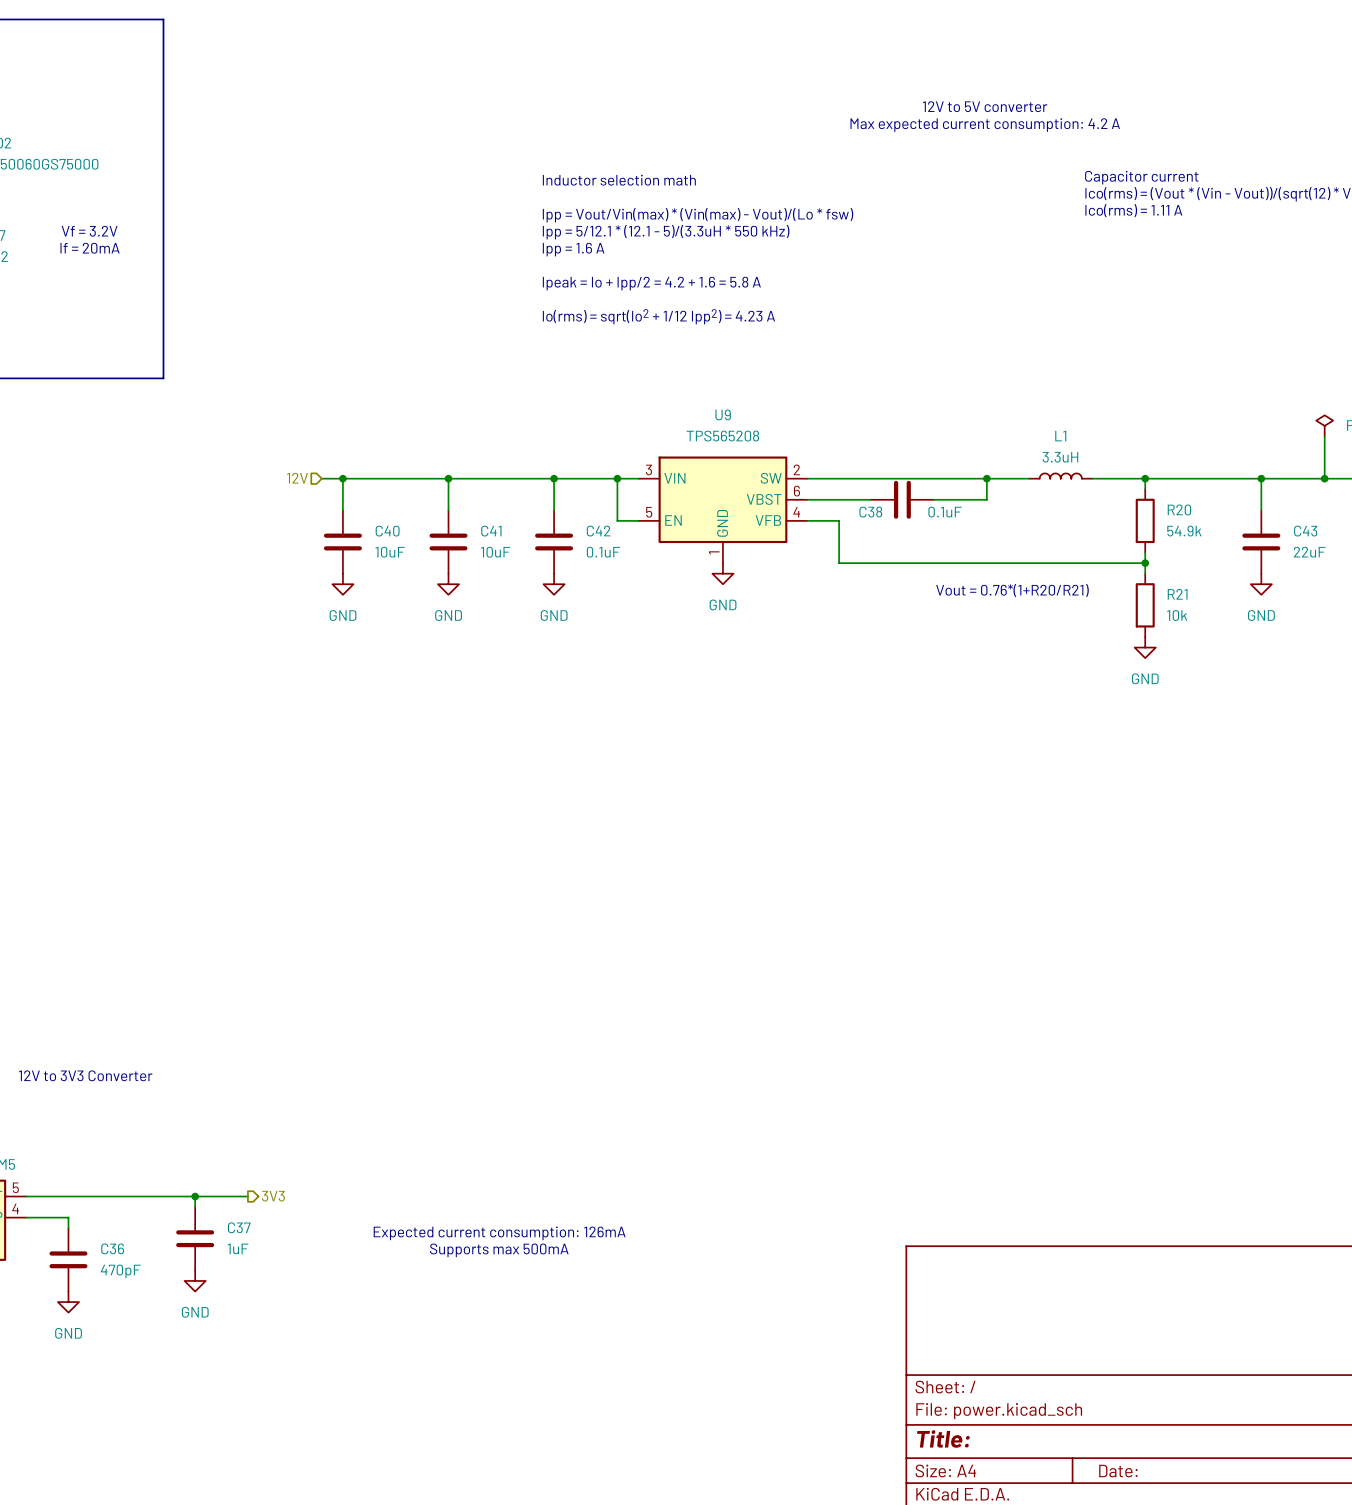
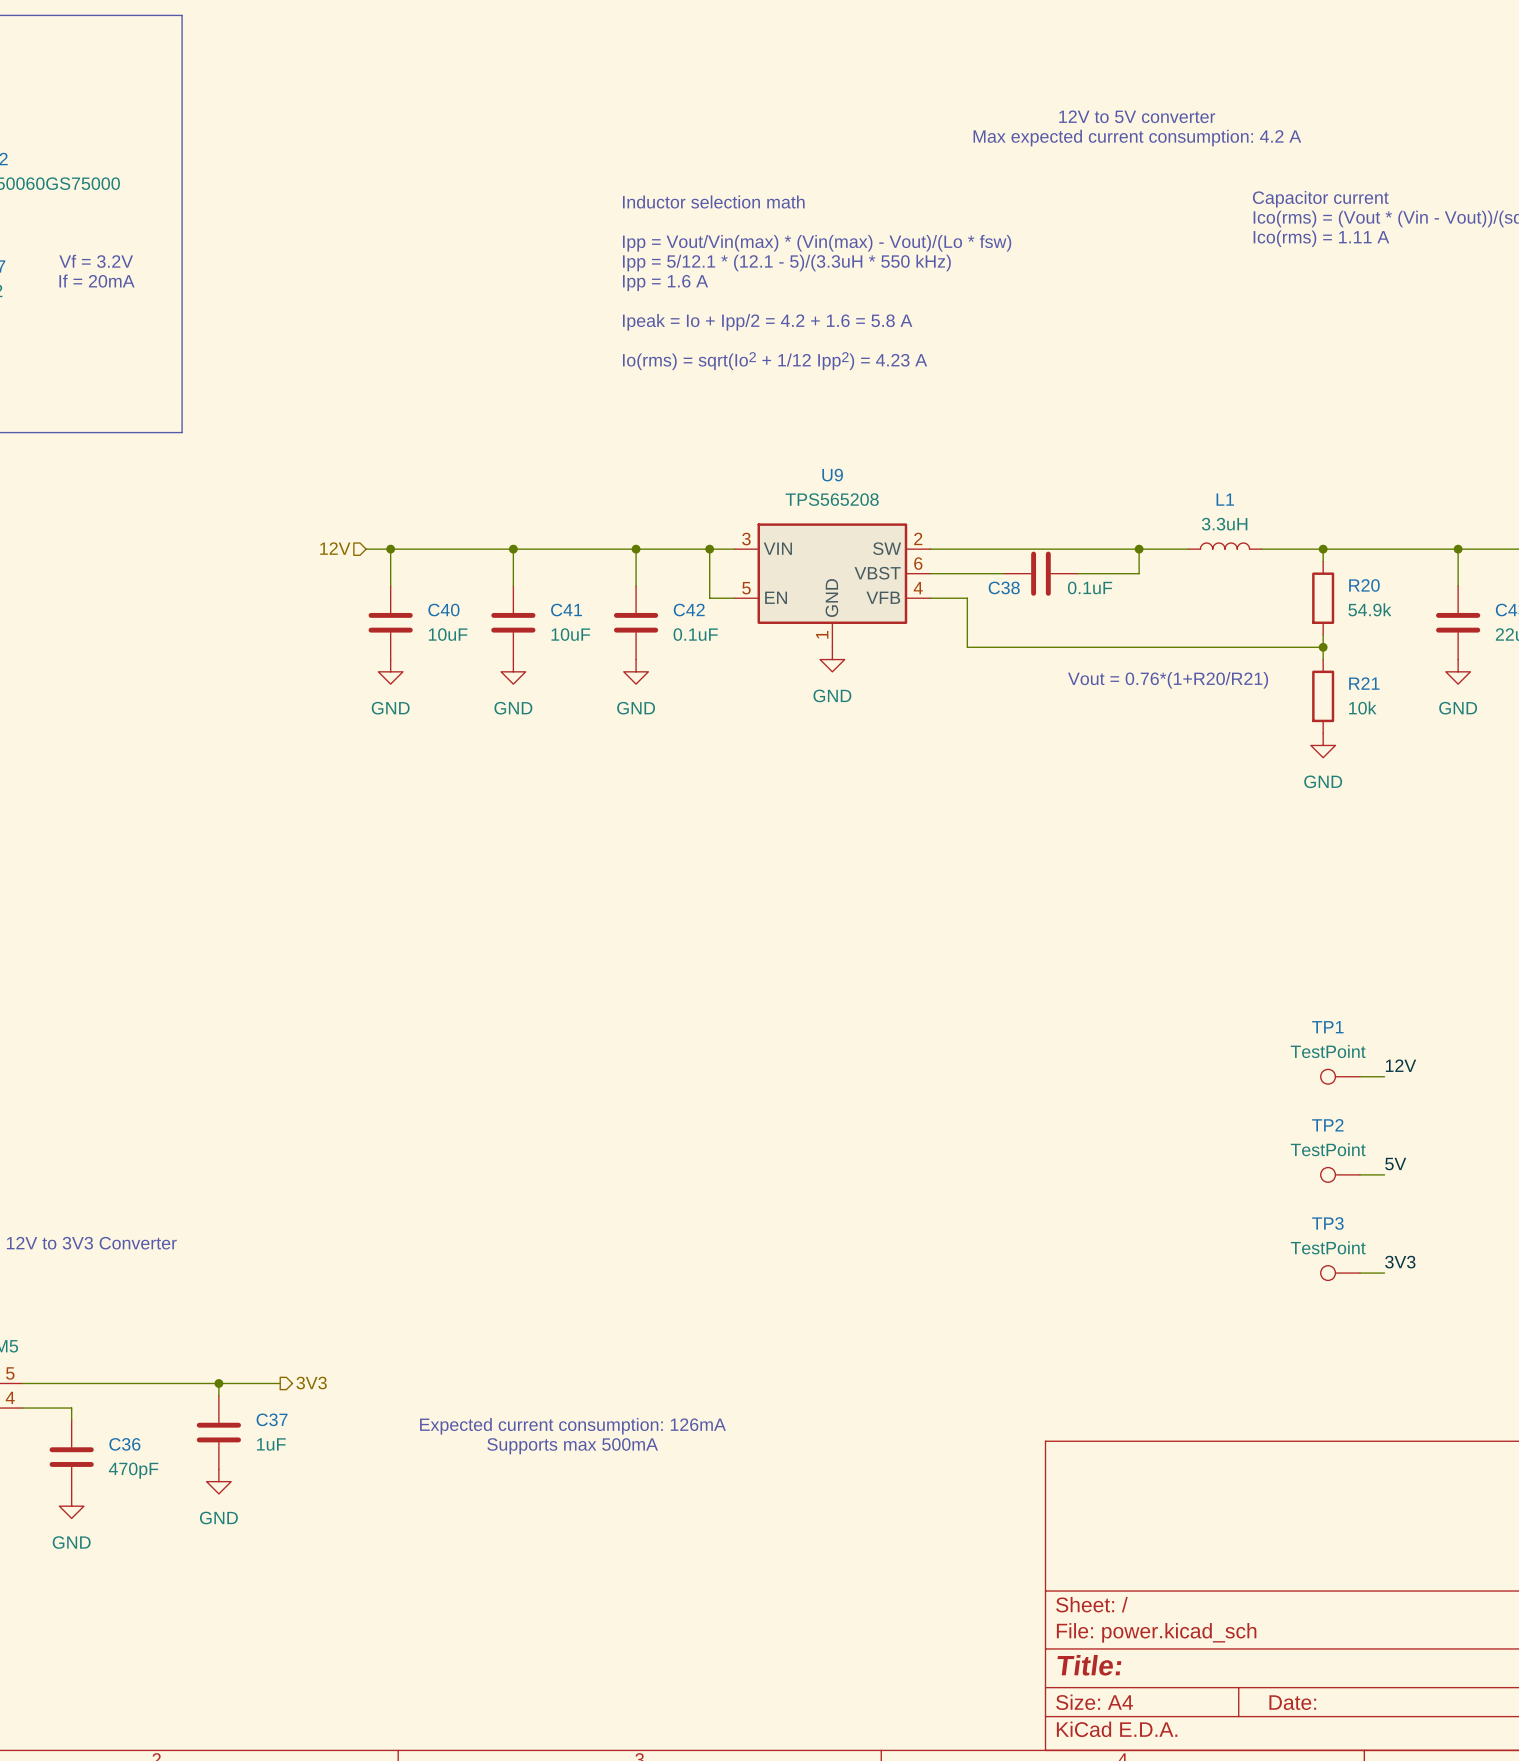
label: none -> 12V (1401, 1065)
TP1: none -> TestPoint (1340, 1076)
wire: none -> (1359, 1076) (1384, 1076)
label: none -> 5V (1395, 1164)
TP2: none -> TestPoint (1340, 1174)
wire: none -> (1359, 1174) (1384, 1174)
label: none -> 3V3 (1400, 1262)
TP3: none -> TestPoint (1340, 1273)
wire: none -> (1359, 1273) (1384, 1273)

